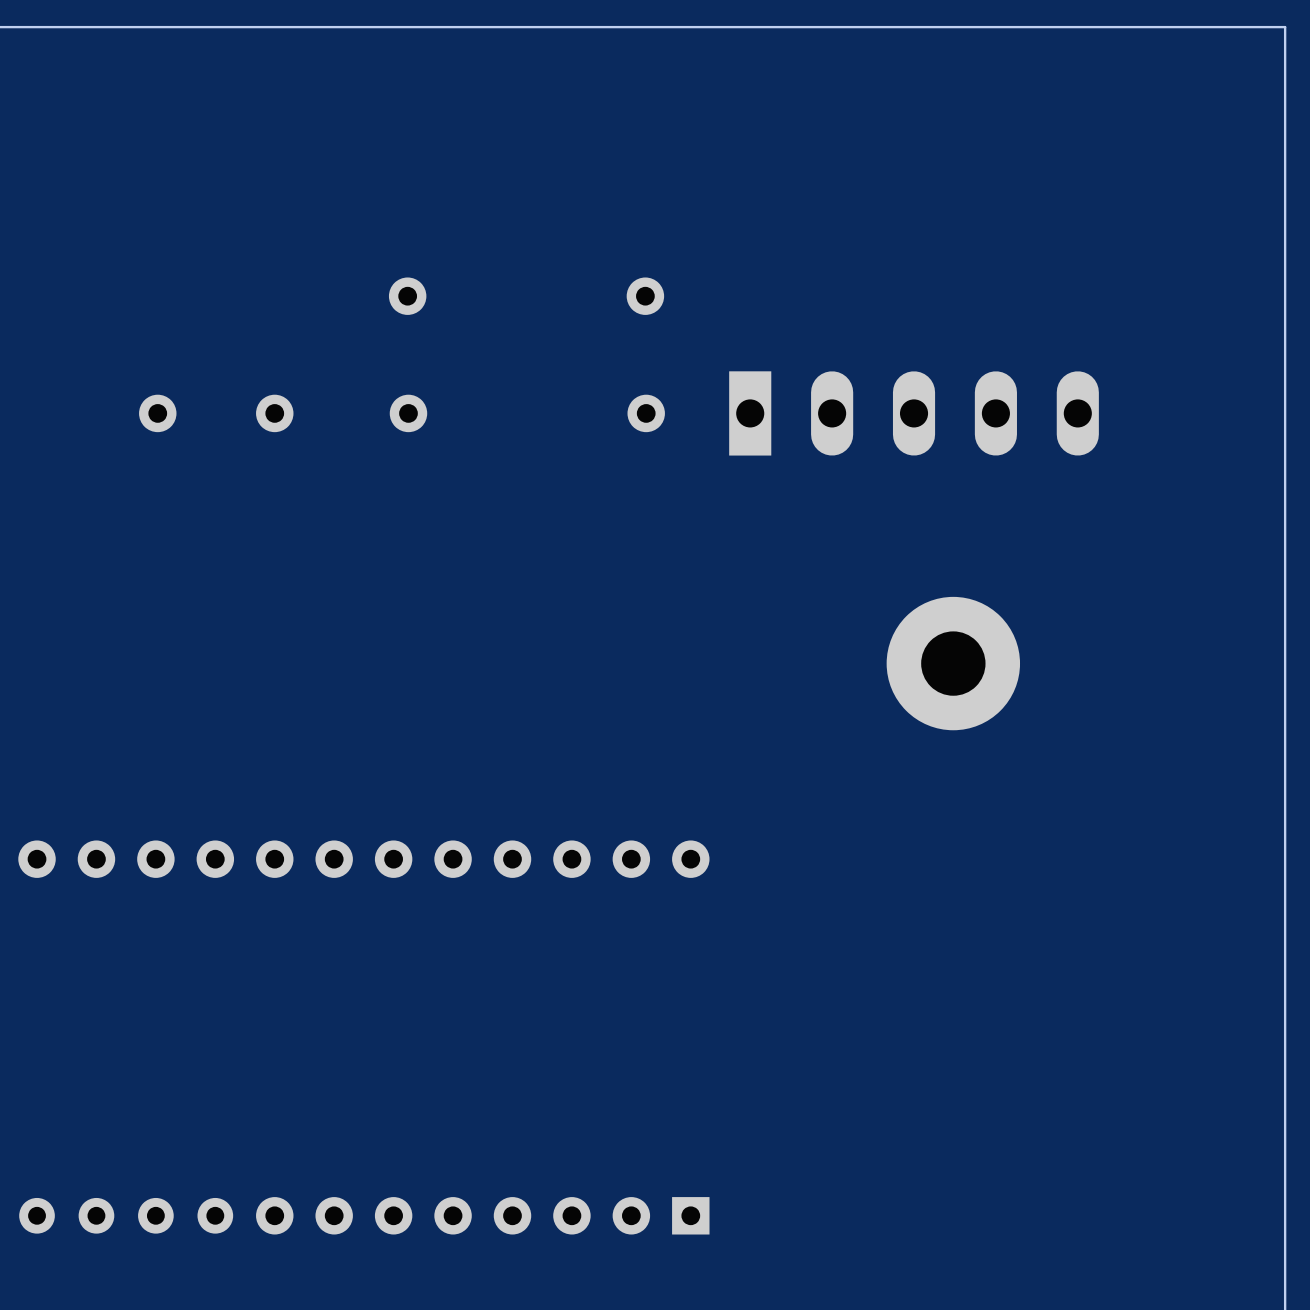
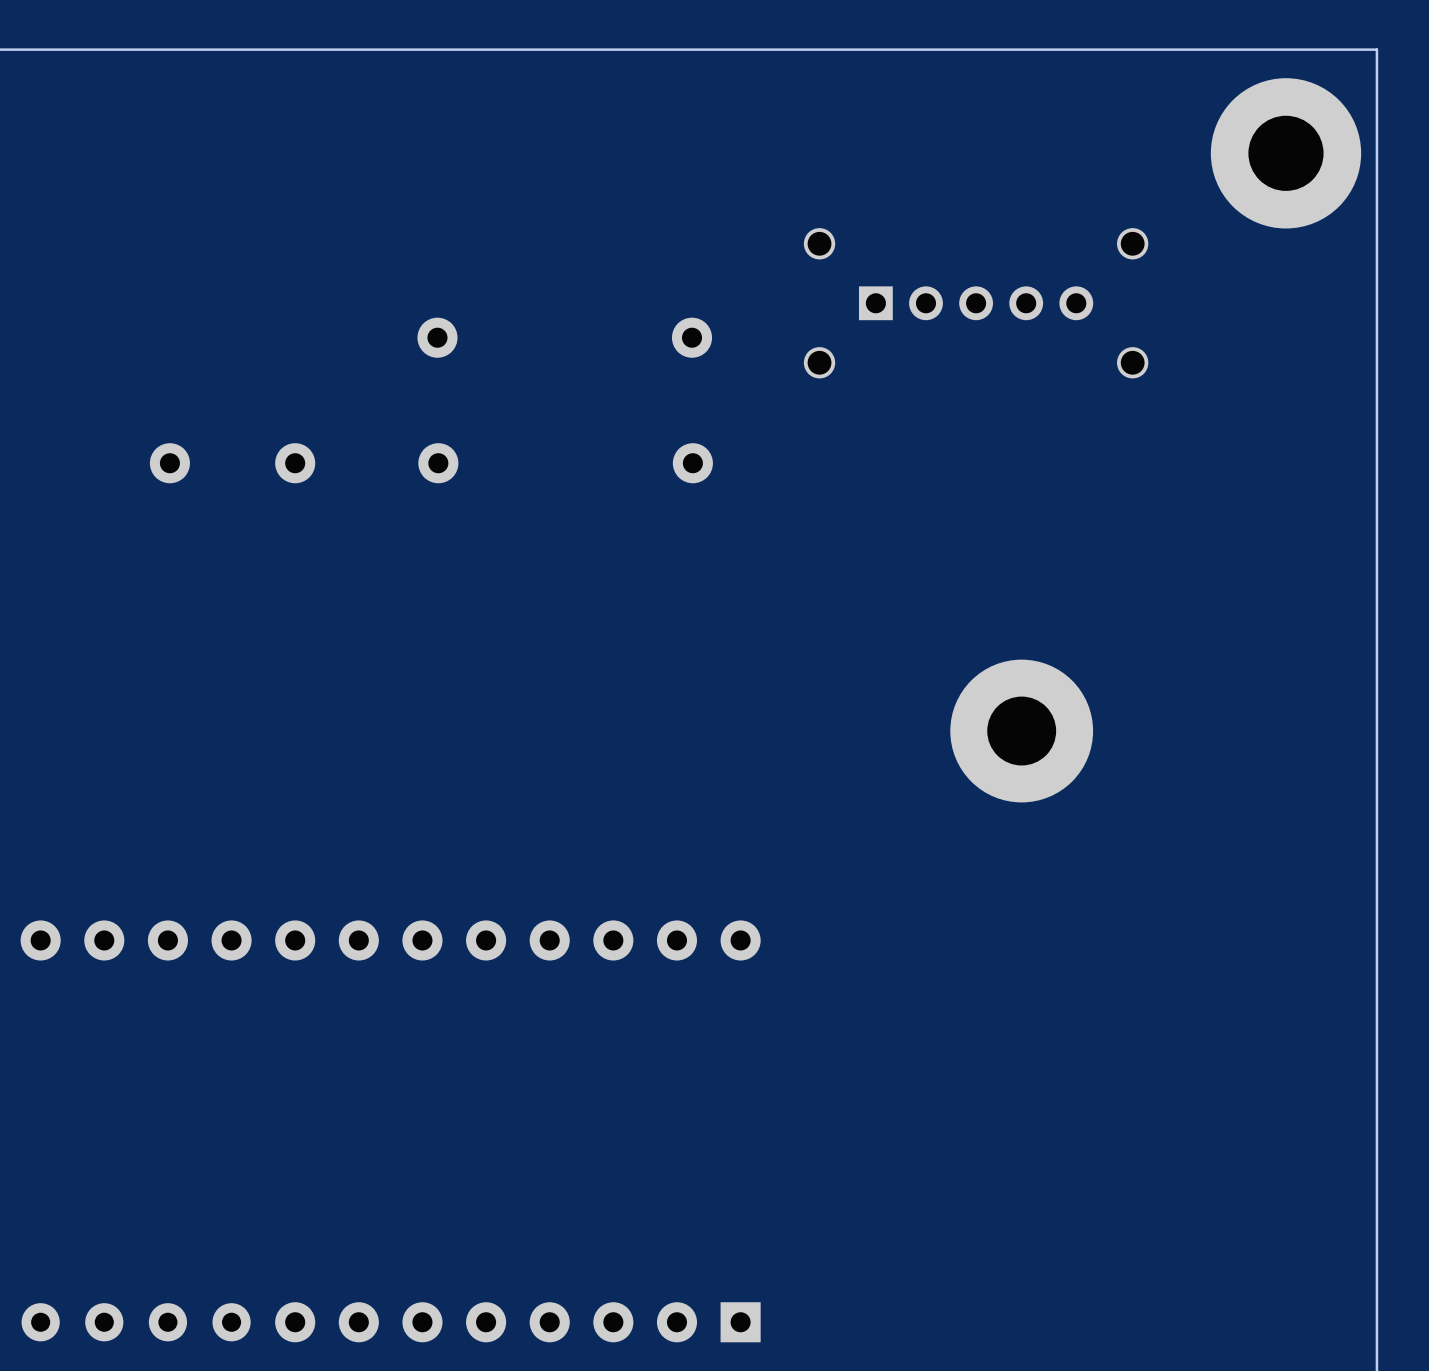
part: none -> (1285, 153)
part: none -> (976, 303)
part: (914, 413) -> none

